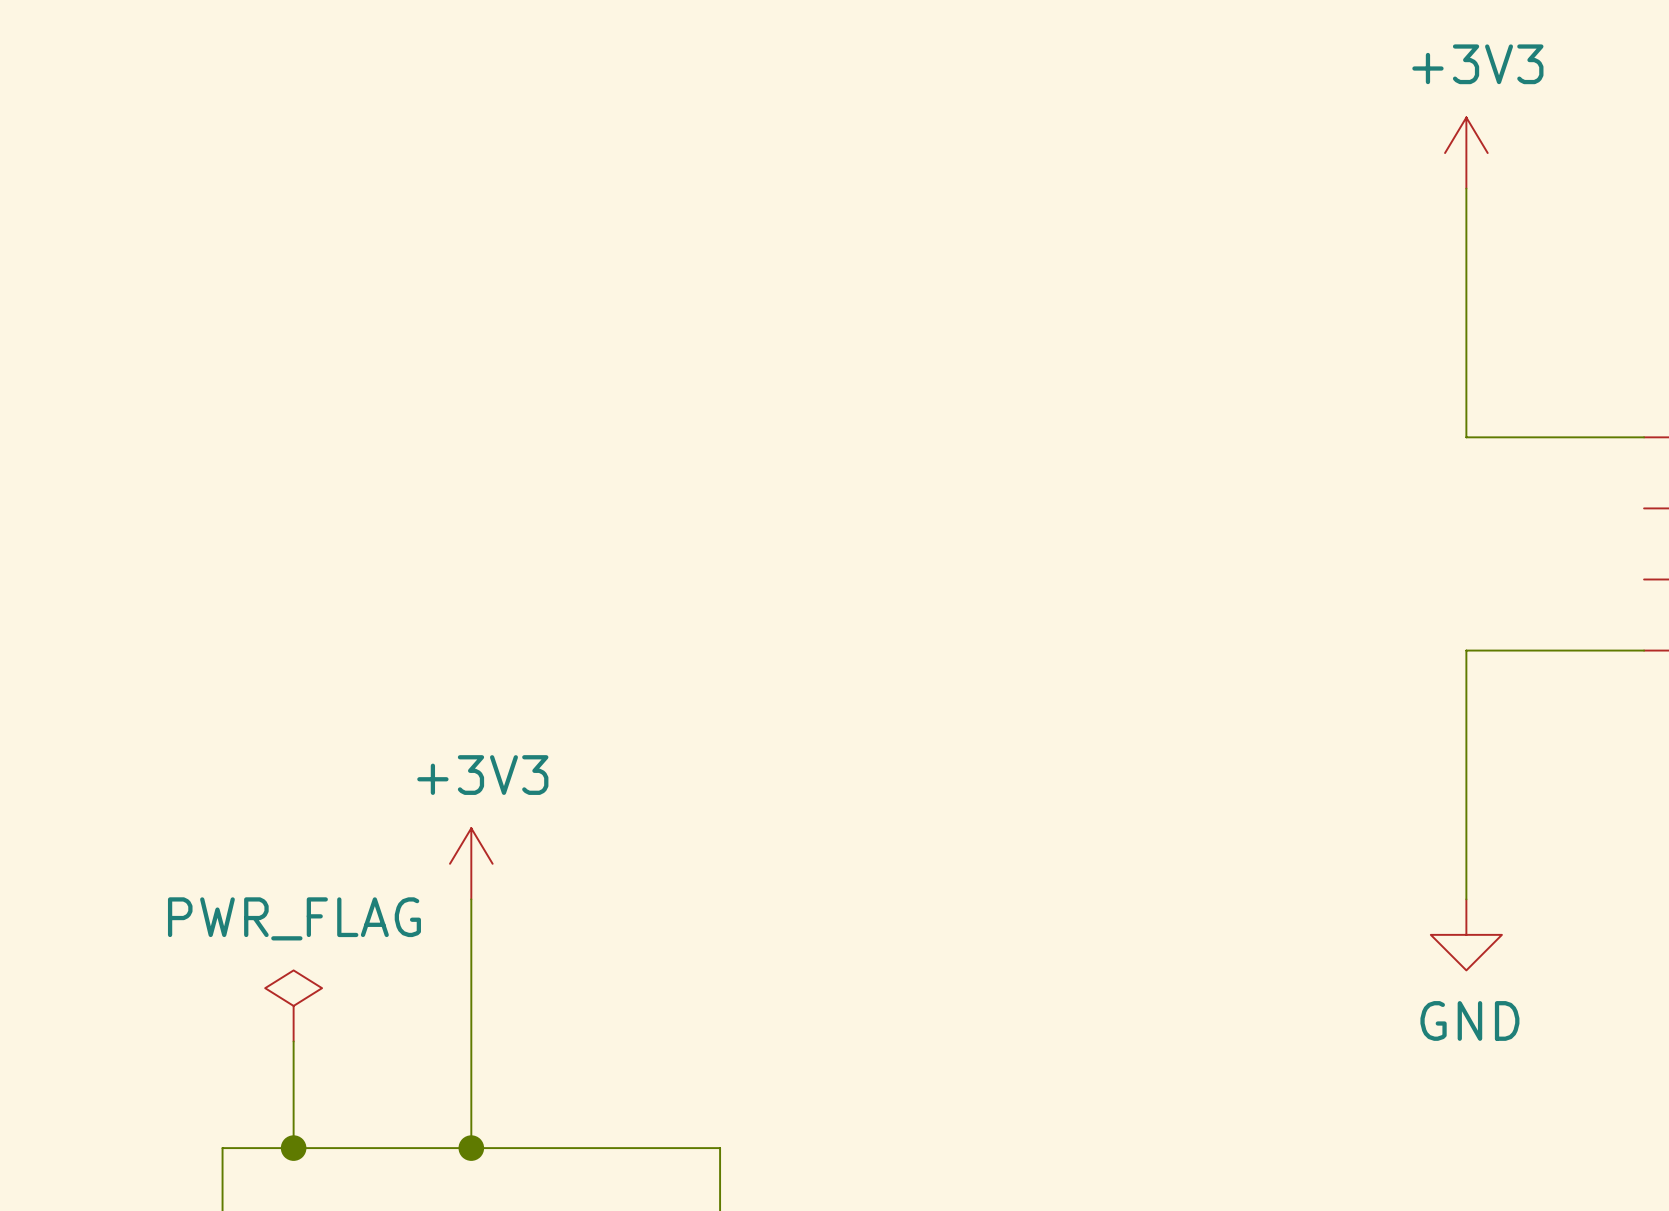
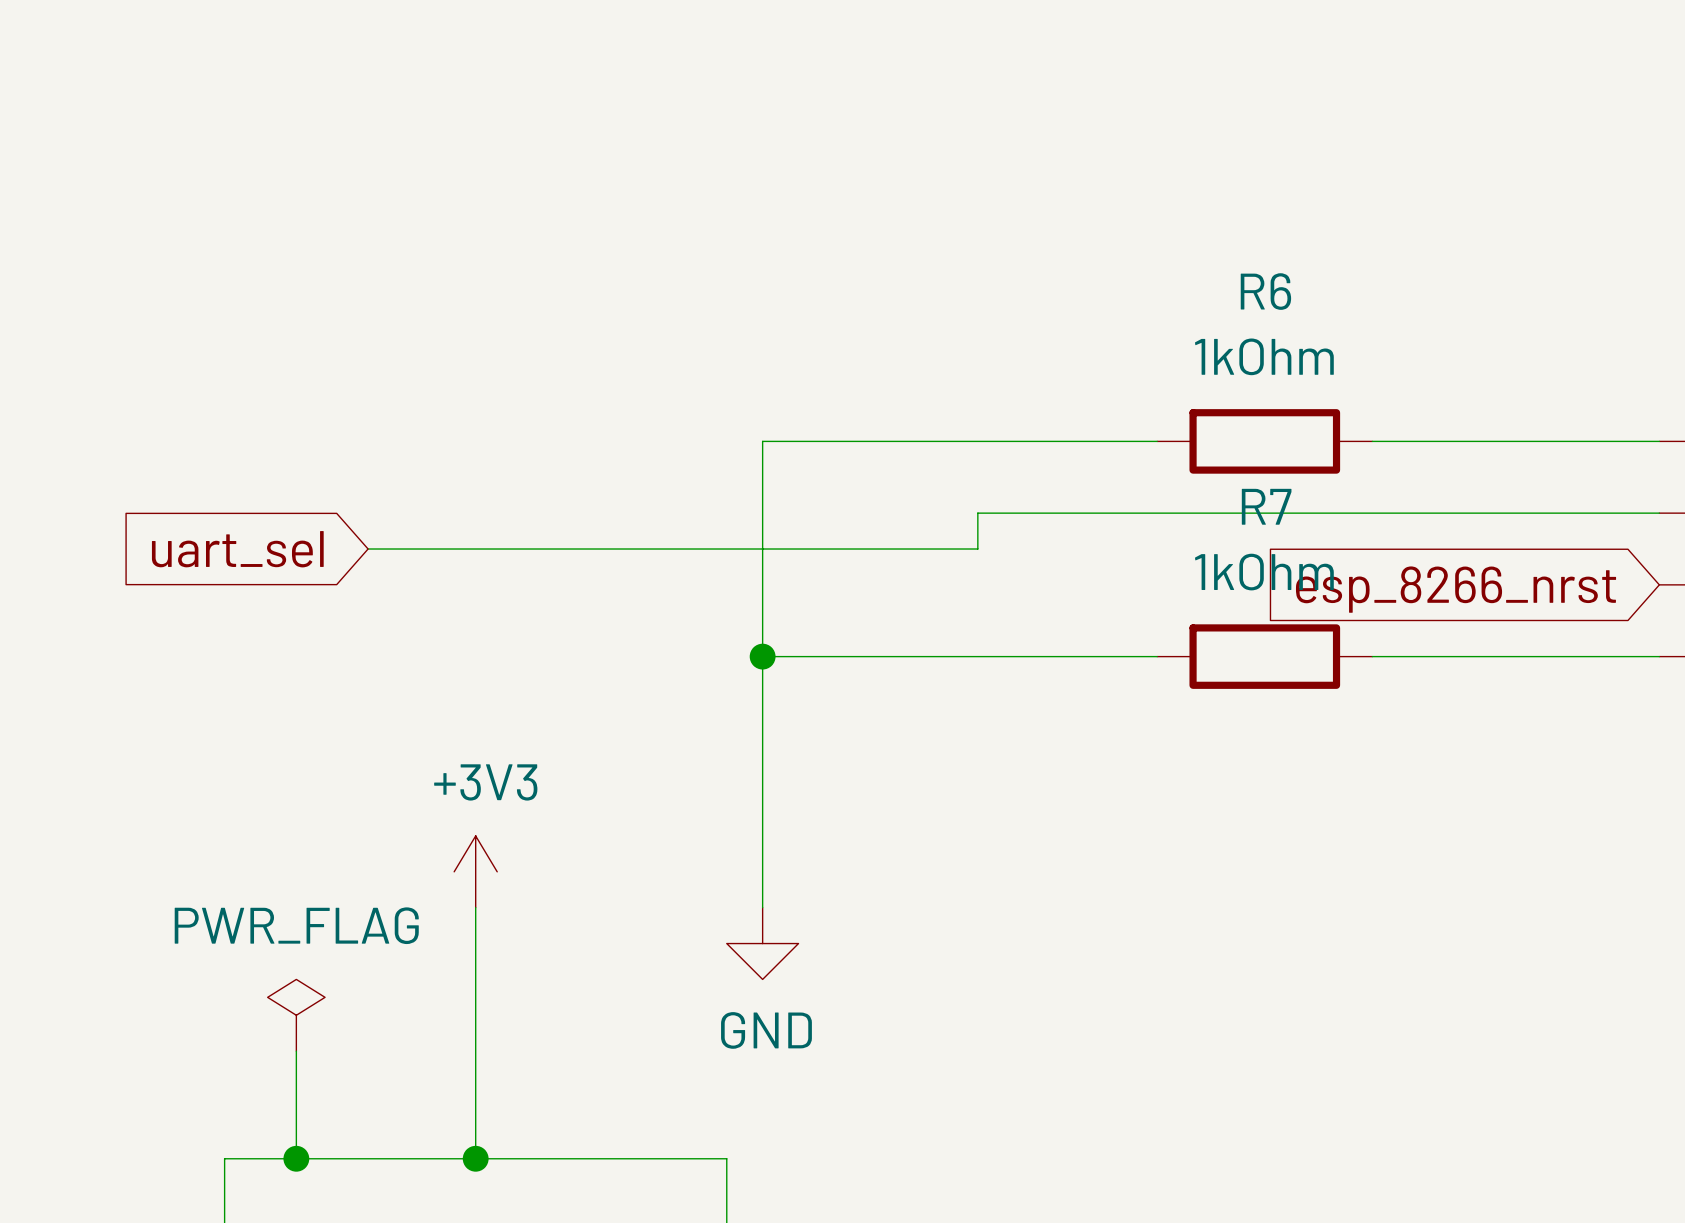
power symbol: +3V3 (1466, 153) -> none
wire: (1466, 188) (1466, 437) -> (1372, 441) (1480, 441)
wire: none -> (1157, 441) (762, 441) (762, 907)
R6: none -> 1kOhm (1264, 441)
wire: none -> (1659, 513) (977, 513) (977, 549) (368, 549)
global label: none -> uart_sel (237, 549)
global label: none -> esp_8266_nrst (1456, 589)
wire: none -> (762, 656) (1157, 656)
junction: none -> (762, 656)
R7: none -> 1kOhm (1264, 656)
wire: (1466, 650) (1466, 899) -> (1480, 656) (1372, 656)
power symbol: none -> GND (762, 943)
power symbol: GND (1466, 934) -> none

